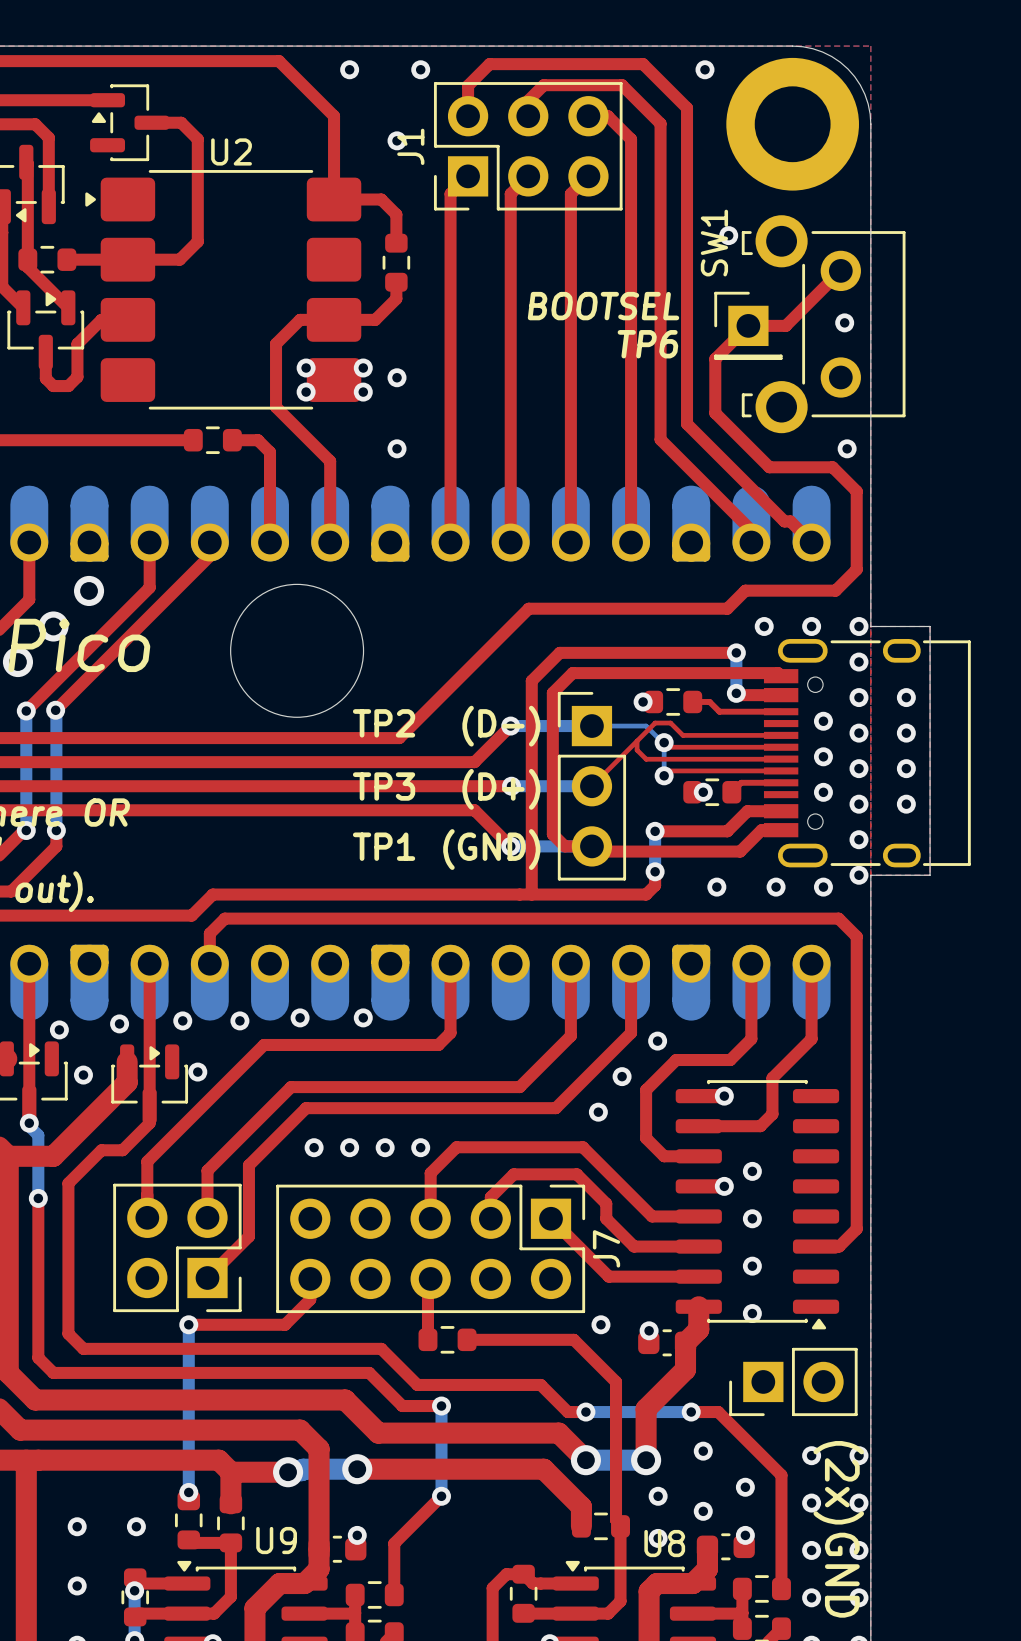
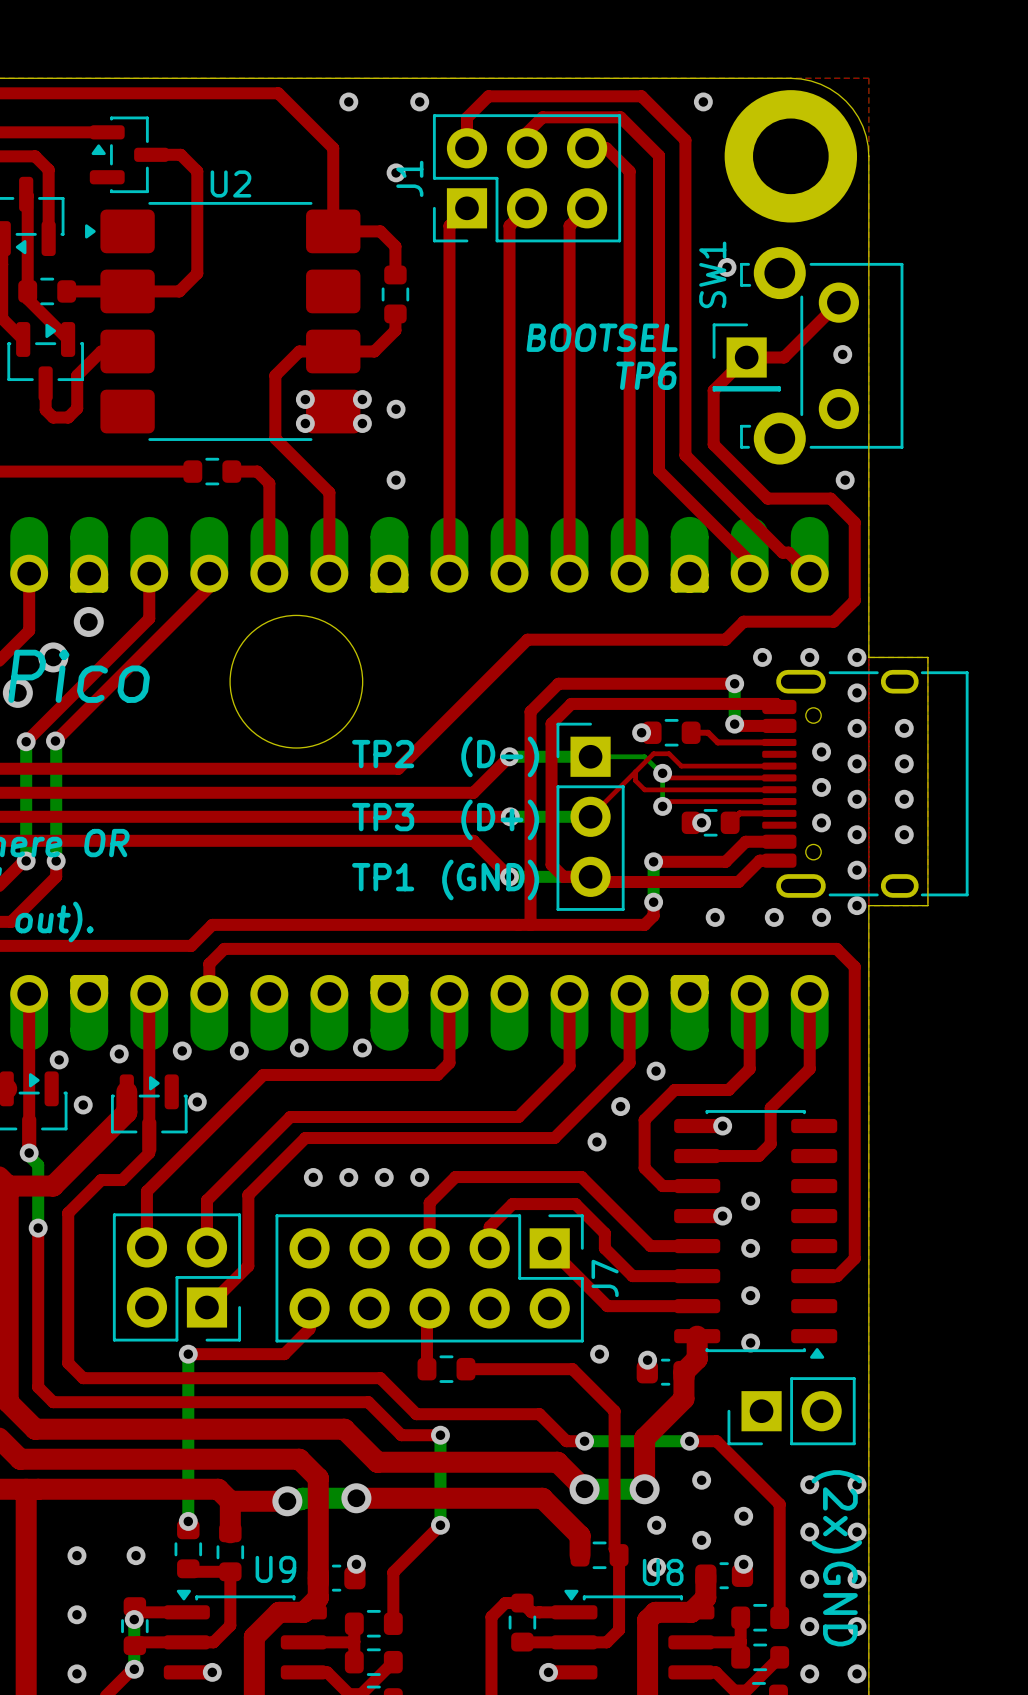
part footprint: [763, 638, 971, 868] -> [762, 669, 969, 898]

